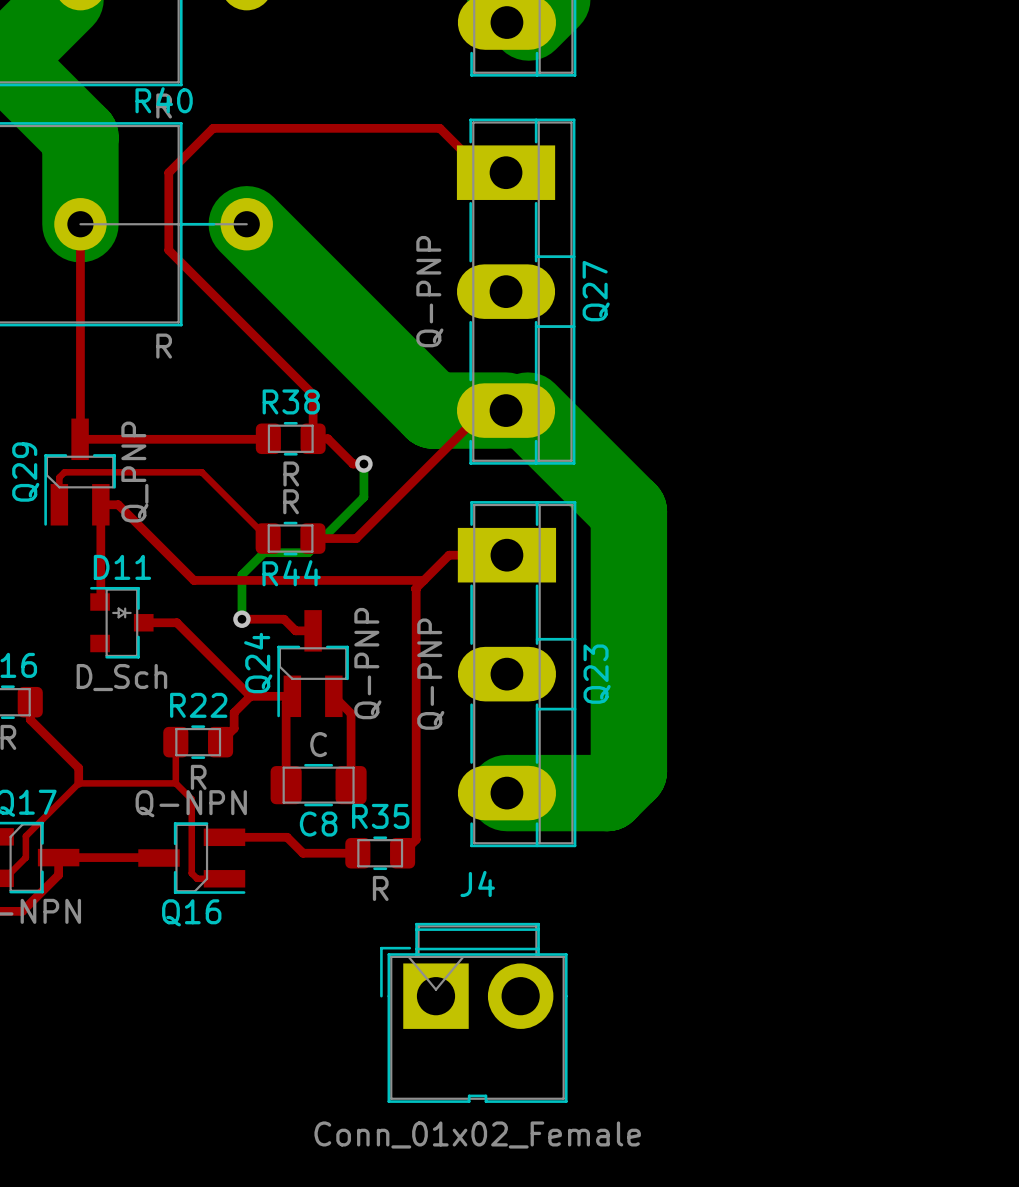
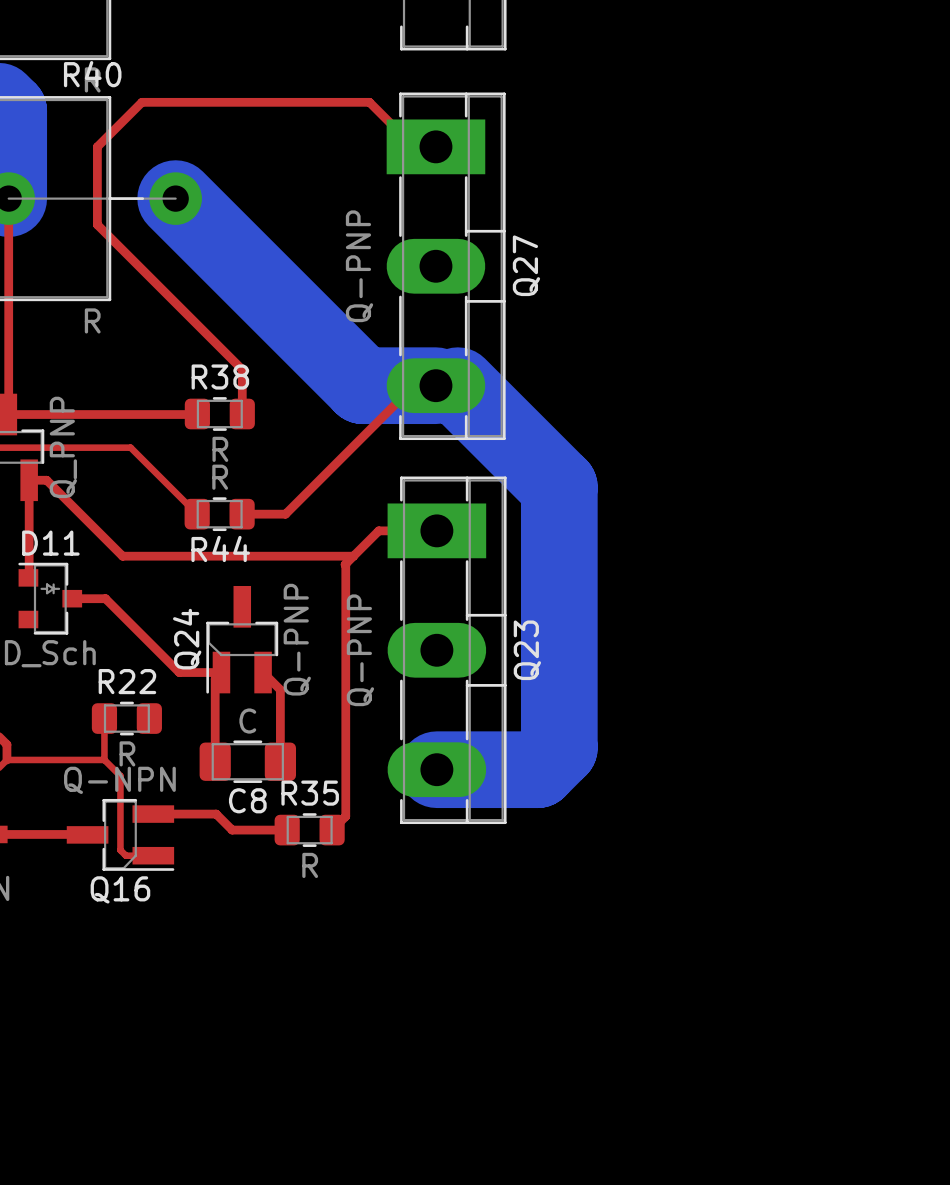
top track: (313, 438) (327, 438) (353, 464) (363, 464) -> none
bottom track: (363, 464) (363, 497) (308, 552) (264, 552) (241, 574) (241, 619) -> none
via: (363, 464) -> none
top track: (241, 619) (284, 619) (295, 630) (313, 630) -> none
via: (241, 619) -> none
top track: (250, 696) (234, 712) (234, 728) (220, 742) -> none
J4: Conn_01x02_Female (473, 1012) -> none

